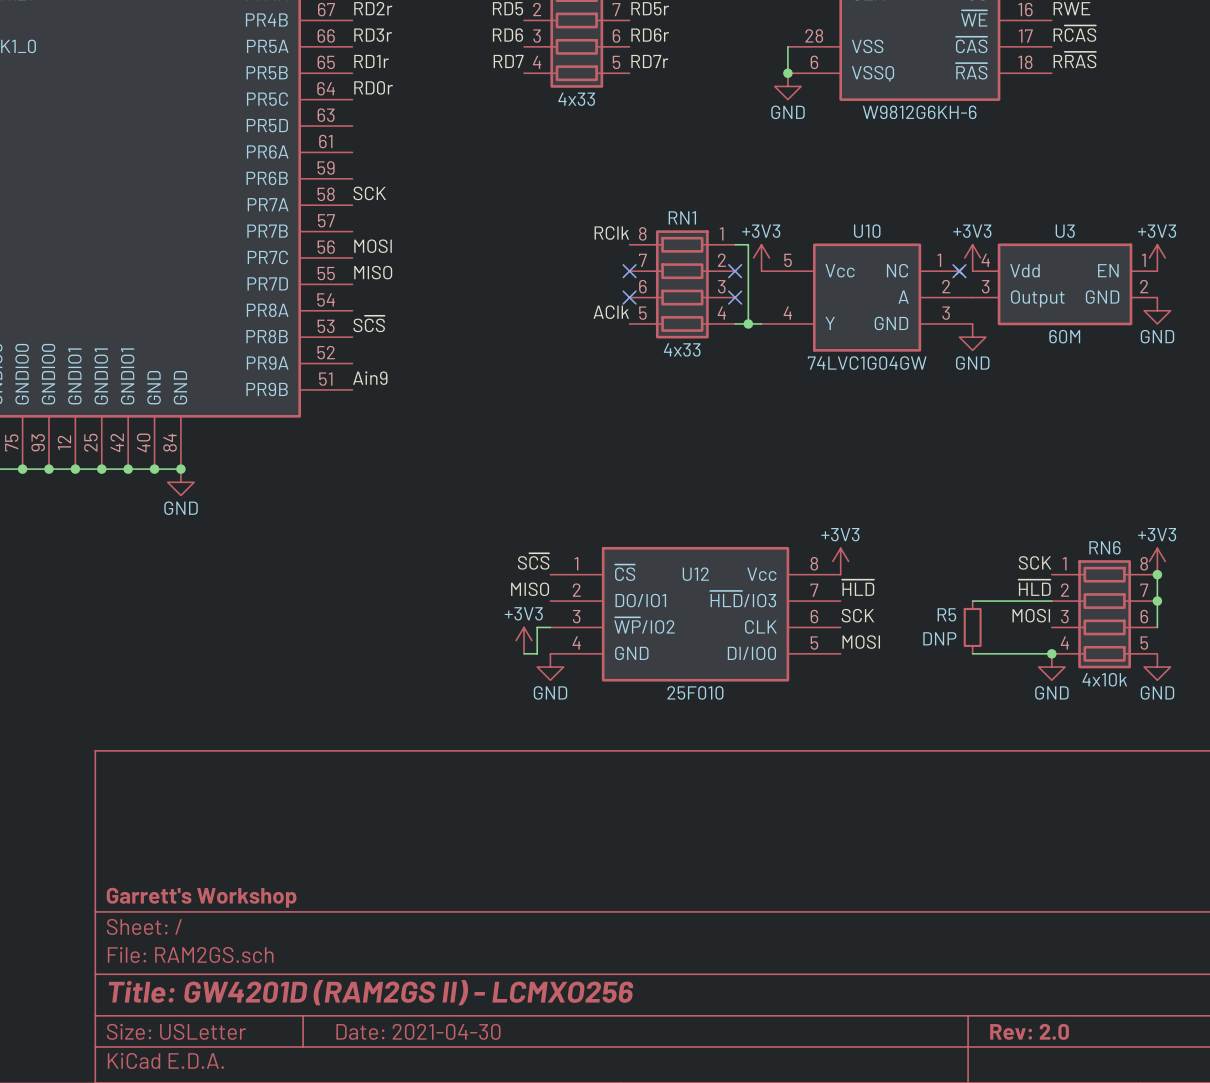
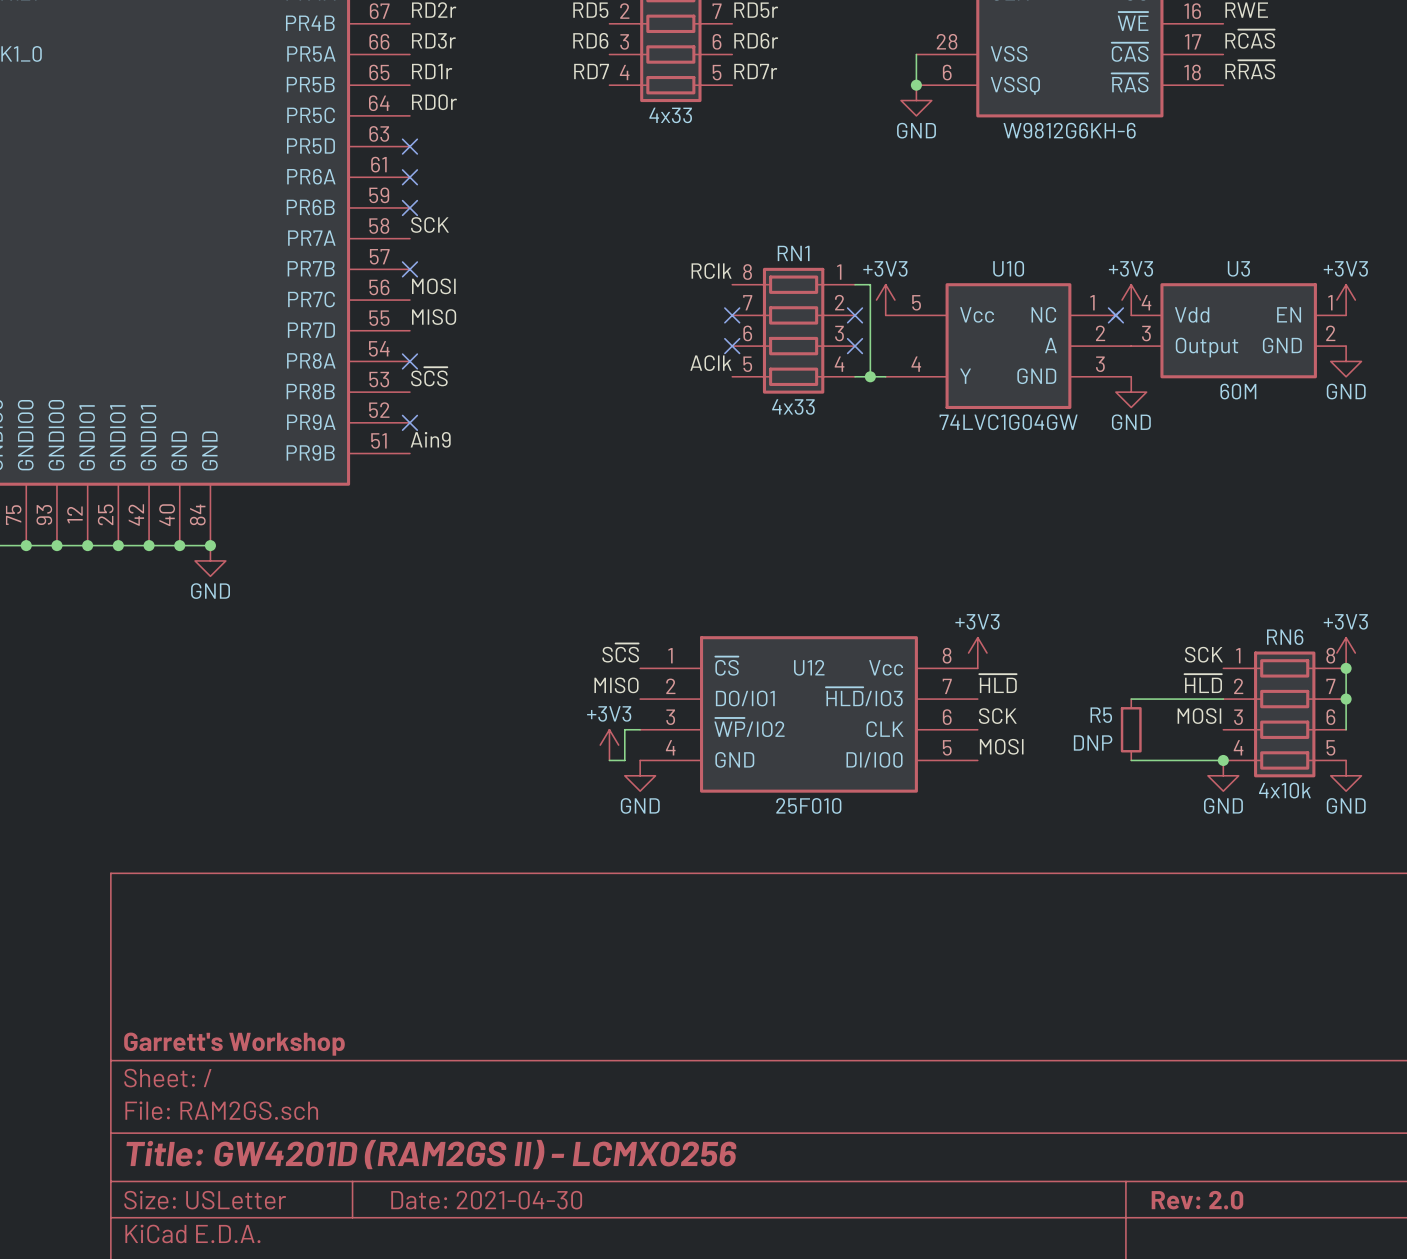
no-connect mark: none -> (409, 146)
no-connect mark: none -> (409, 177)
no-connect mark: none -> (409, 207)
no-connect mark: none -> (409, 269)
no-connect mark: none -> (409, 361)
no-connect mark: none -> (409, 422)

